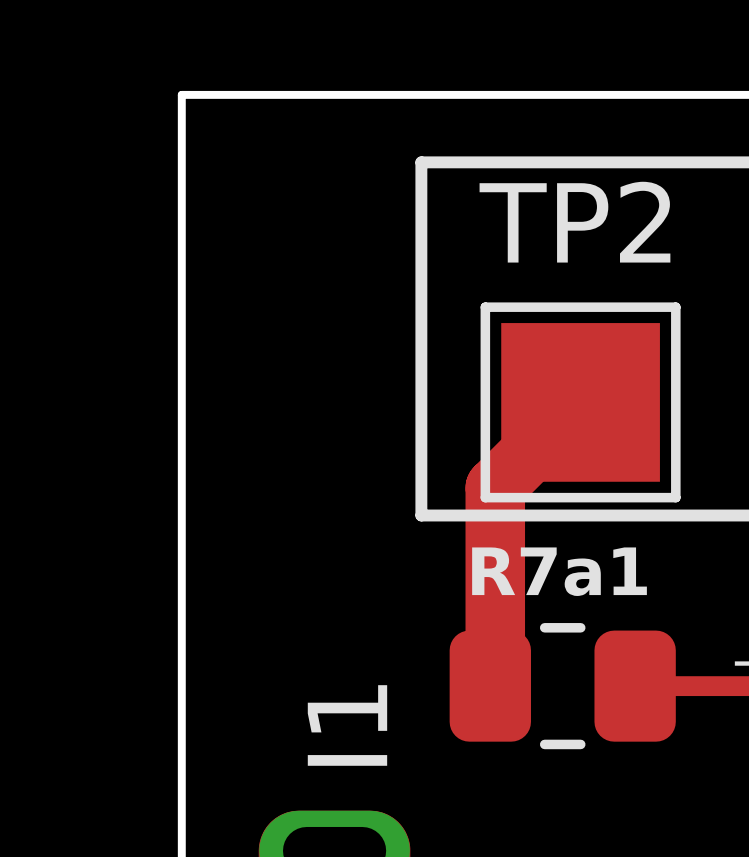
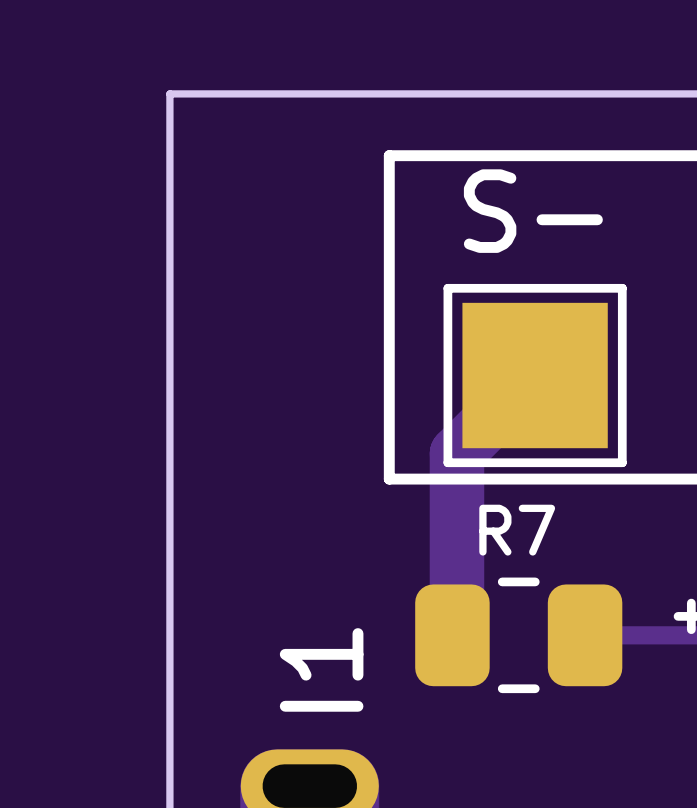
TP2 name: TP2 (574, 222) -> S- (533, 211)
R7a1 name: R7a1 (559, 571) -> R7 (517, 530)

